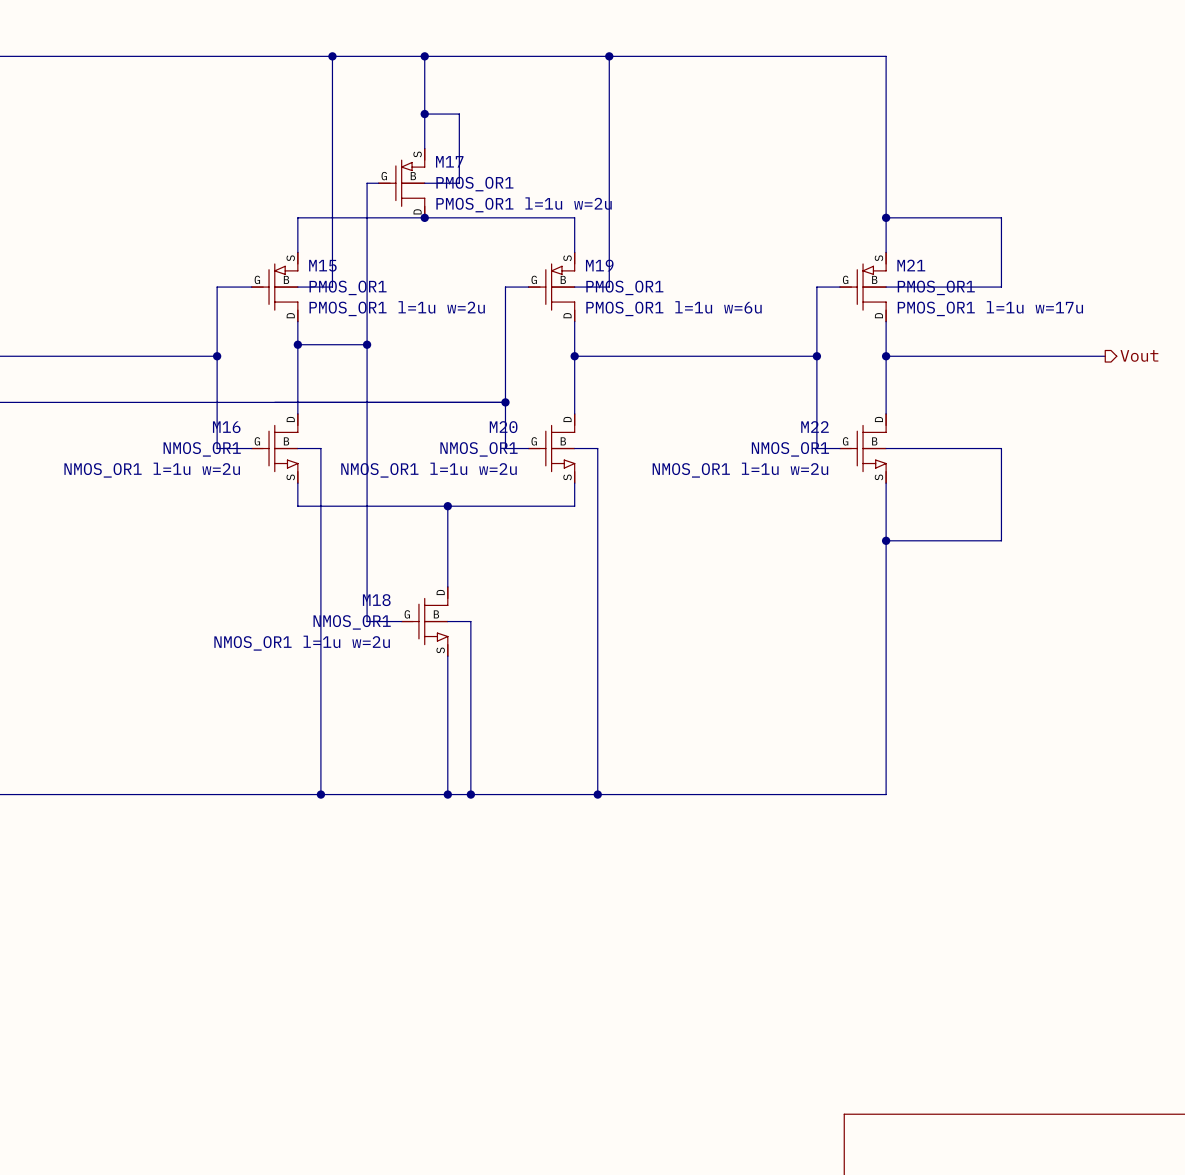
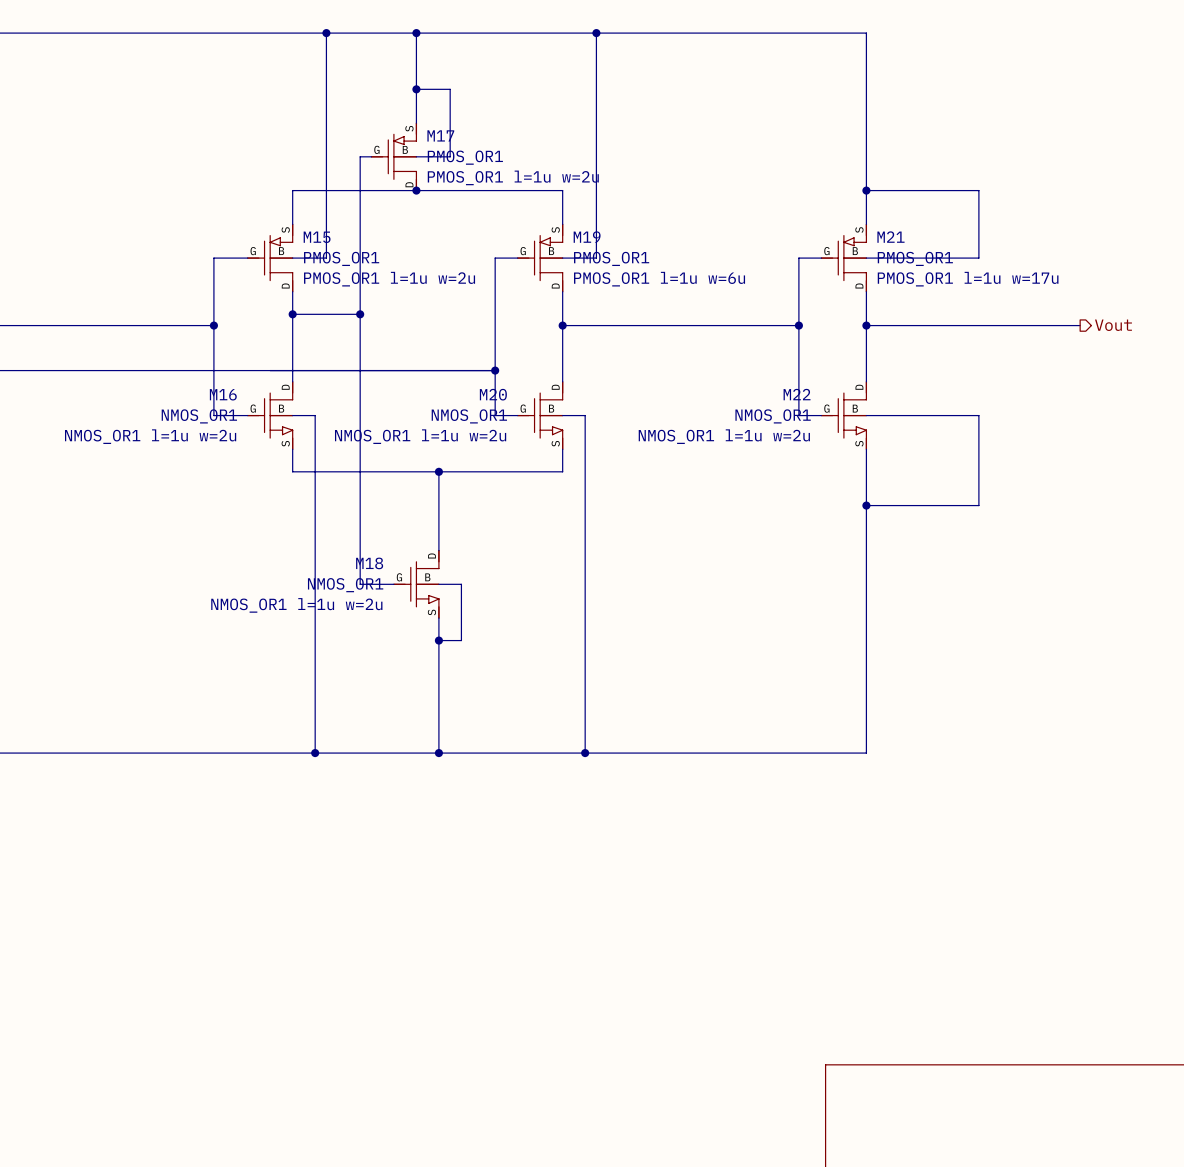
junction: none -> (438, 640)
wire: (470, 679) (470, 794) -> (461, 640) (438, 640)
junction: (470, 794) -> none

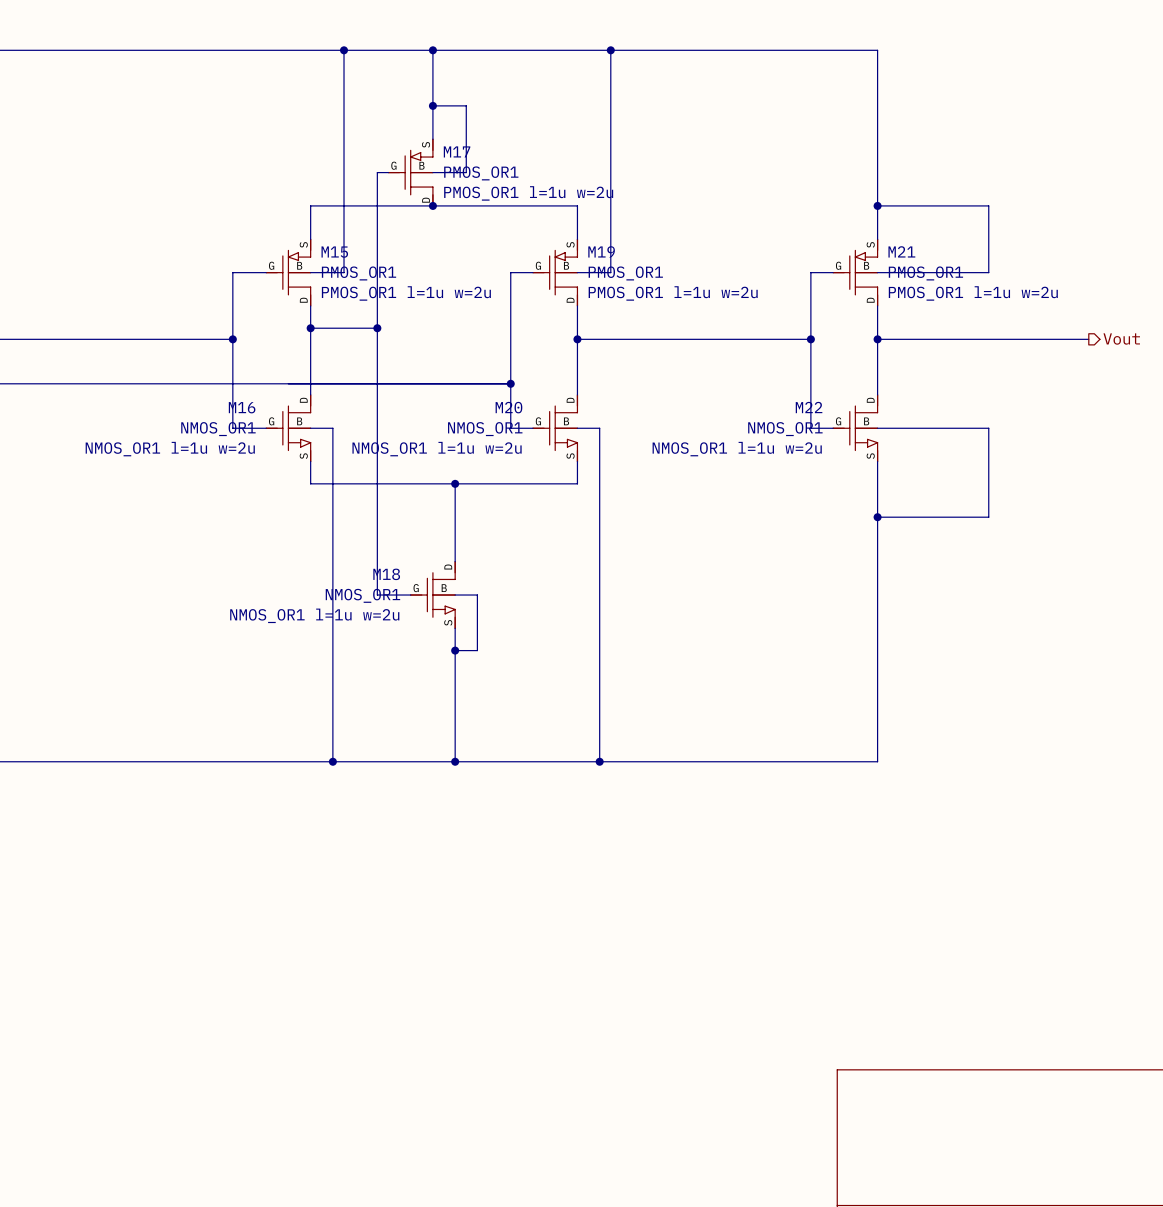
M19 text: PMOS_OR1 l=1u w=6u (659, 279) -> PMOS_OR1 l=1u w=2u (673, 293)
M21 text: PMOS_OR1 l=1u w=17u (968, 279) -> PMOS_OR1 l=1u w=2u (973, 293)

